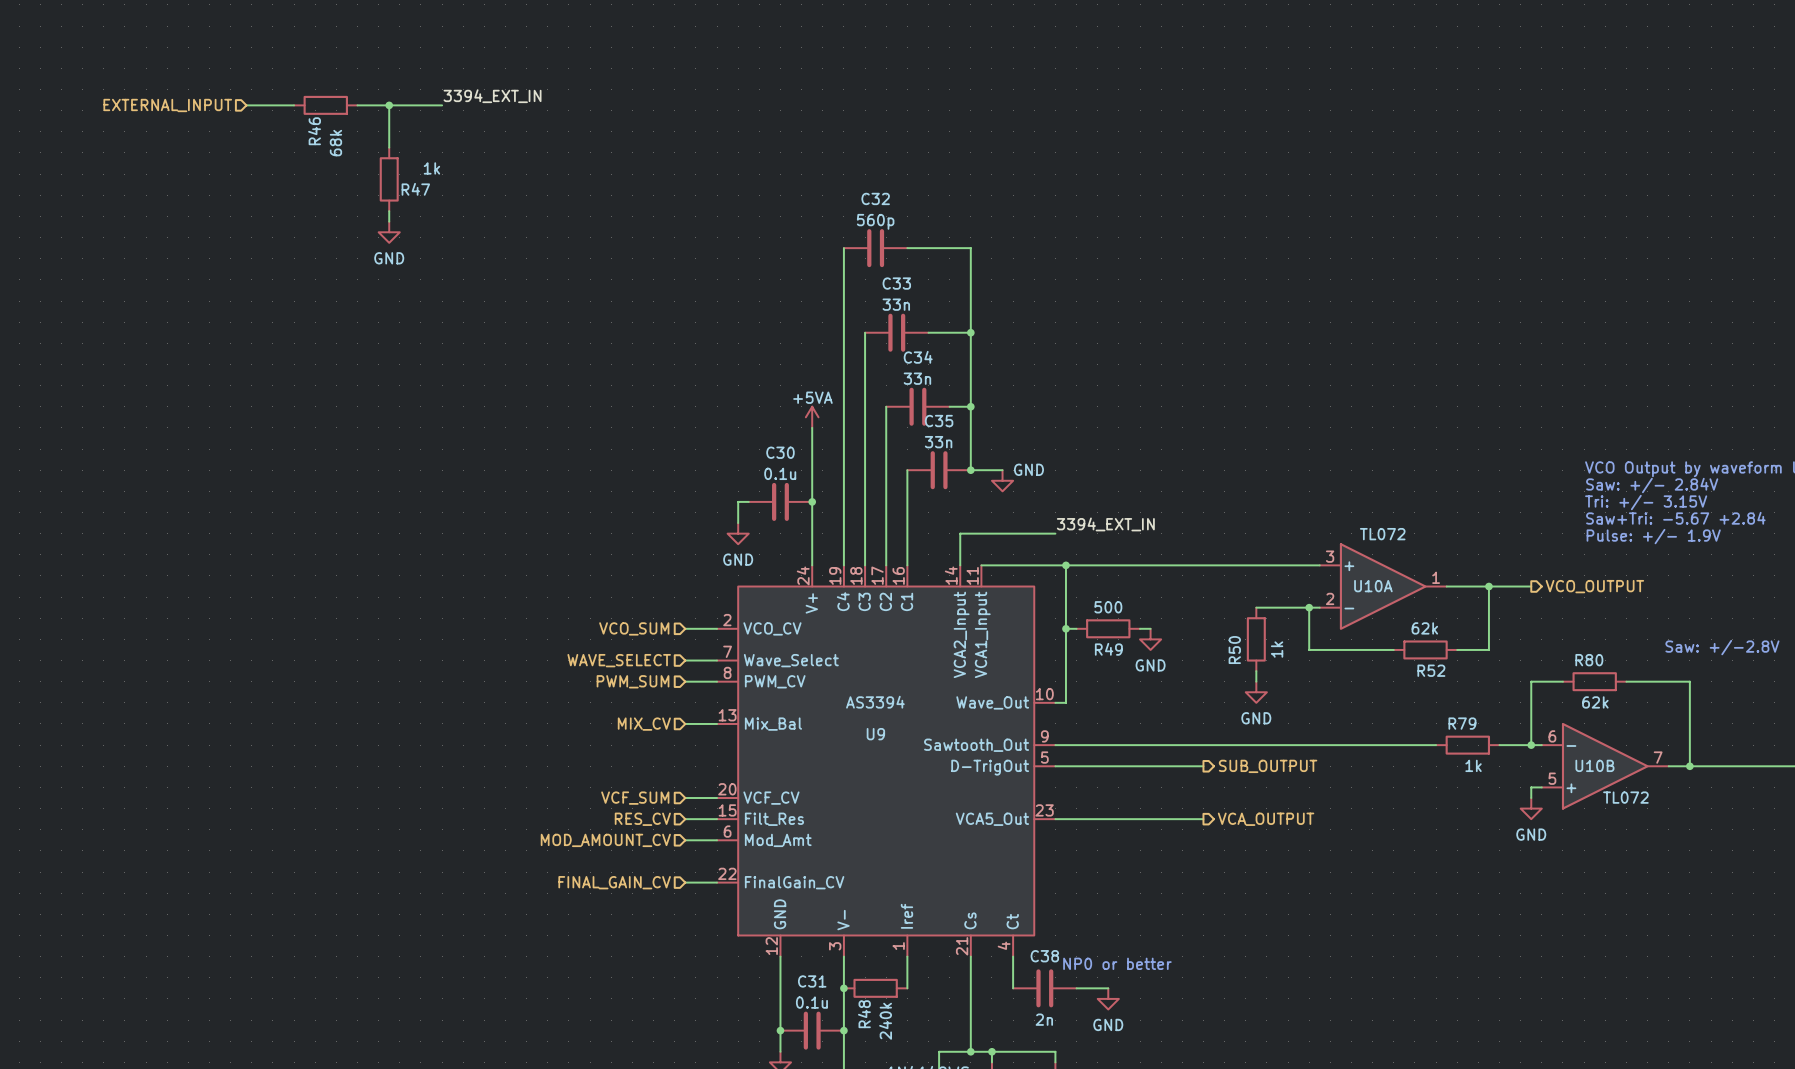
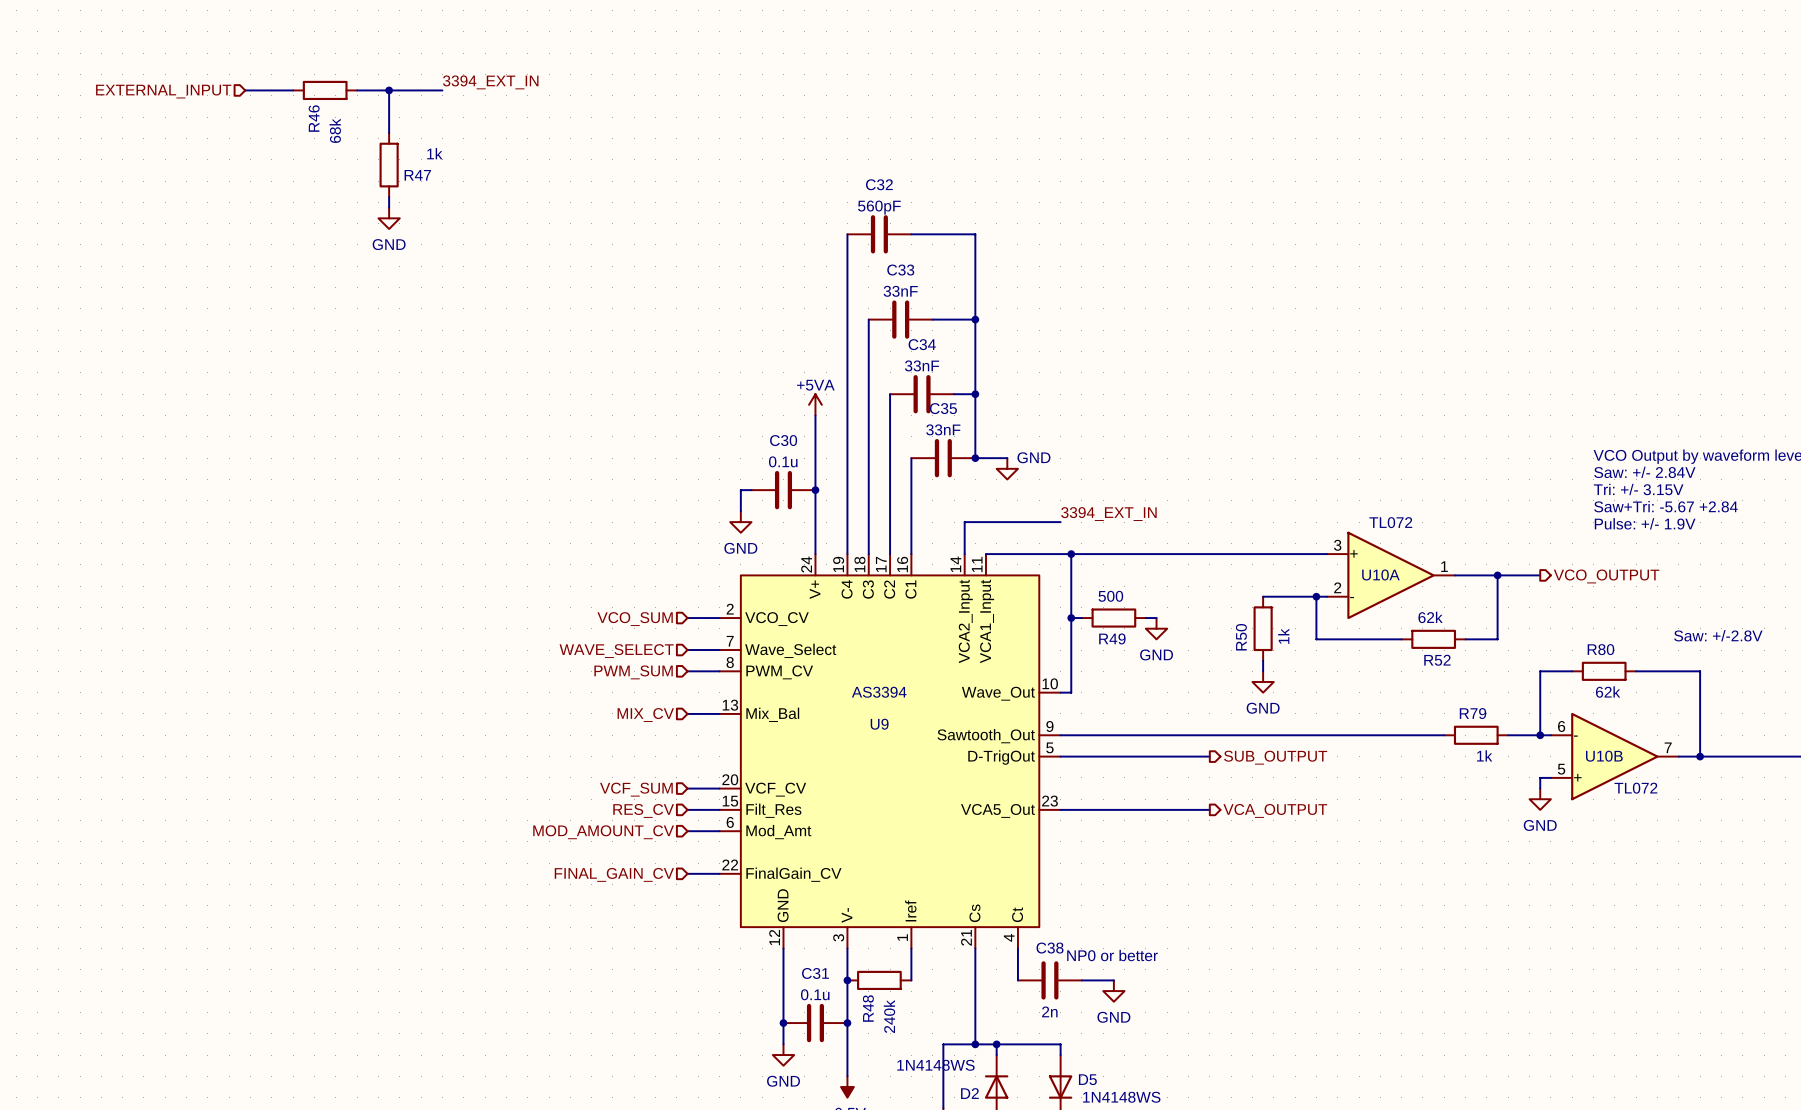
C32 value: 560p (875, 221) -> 560pF (879, 207)
C33 value: 33n (896, 304) -> 33nF (900, 291)
C34 value: 33n (917, 378) -> 33nF (922, 365)
C35 value: 33n (938, 442) -> 33nF (943, 429)

